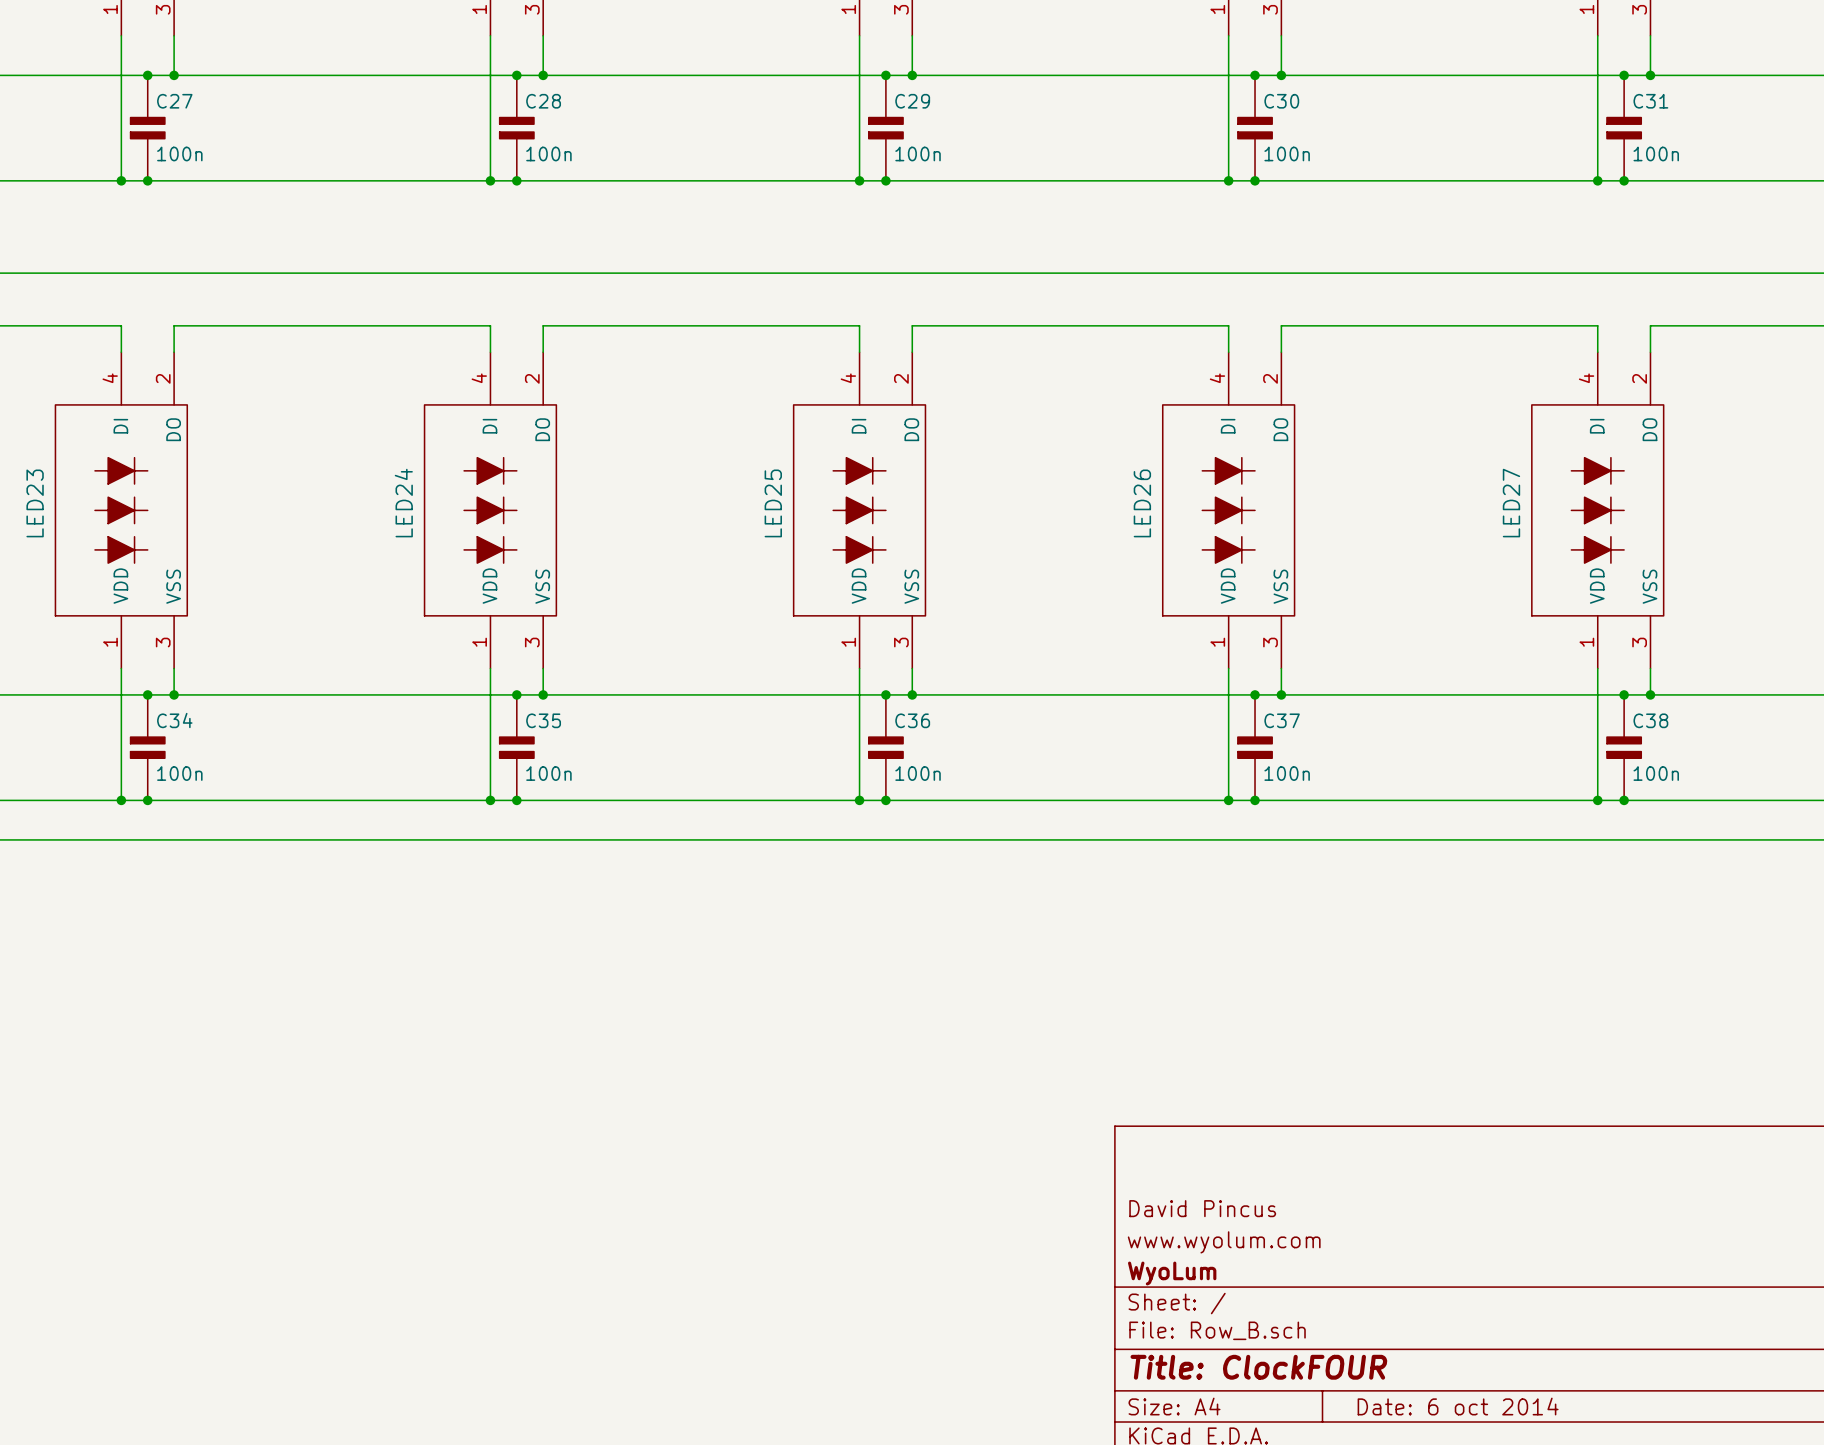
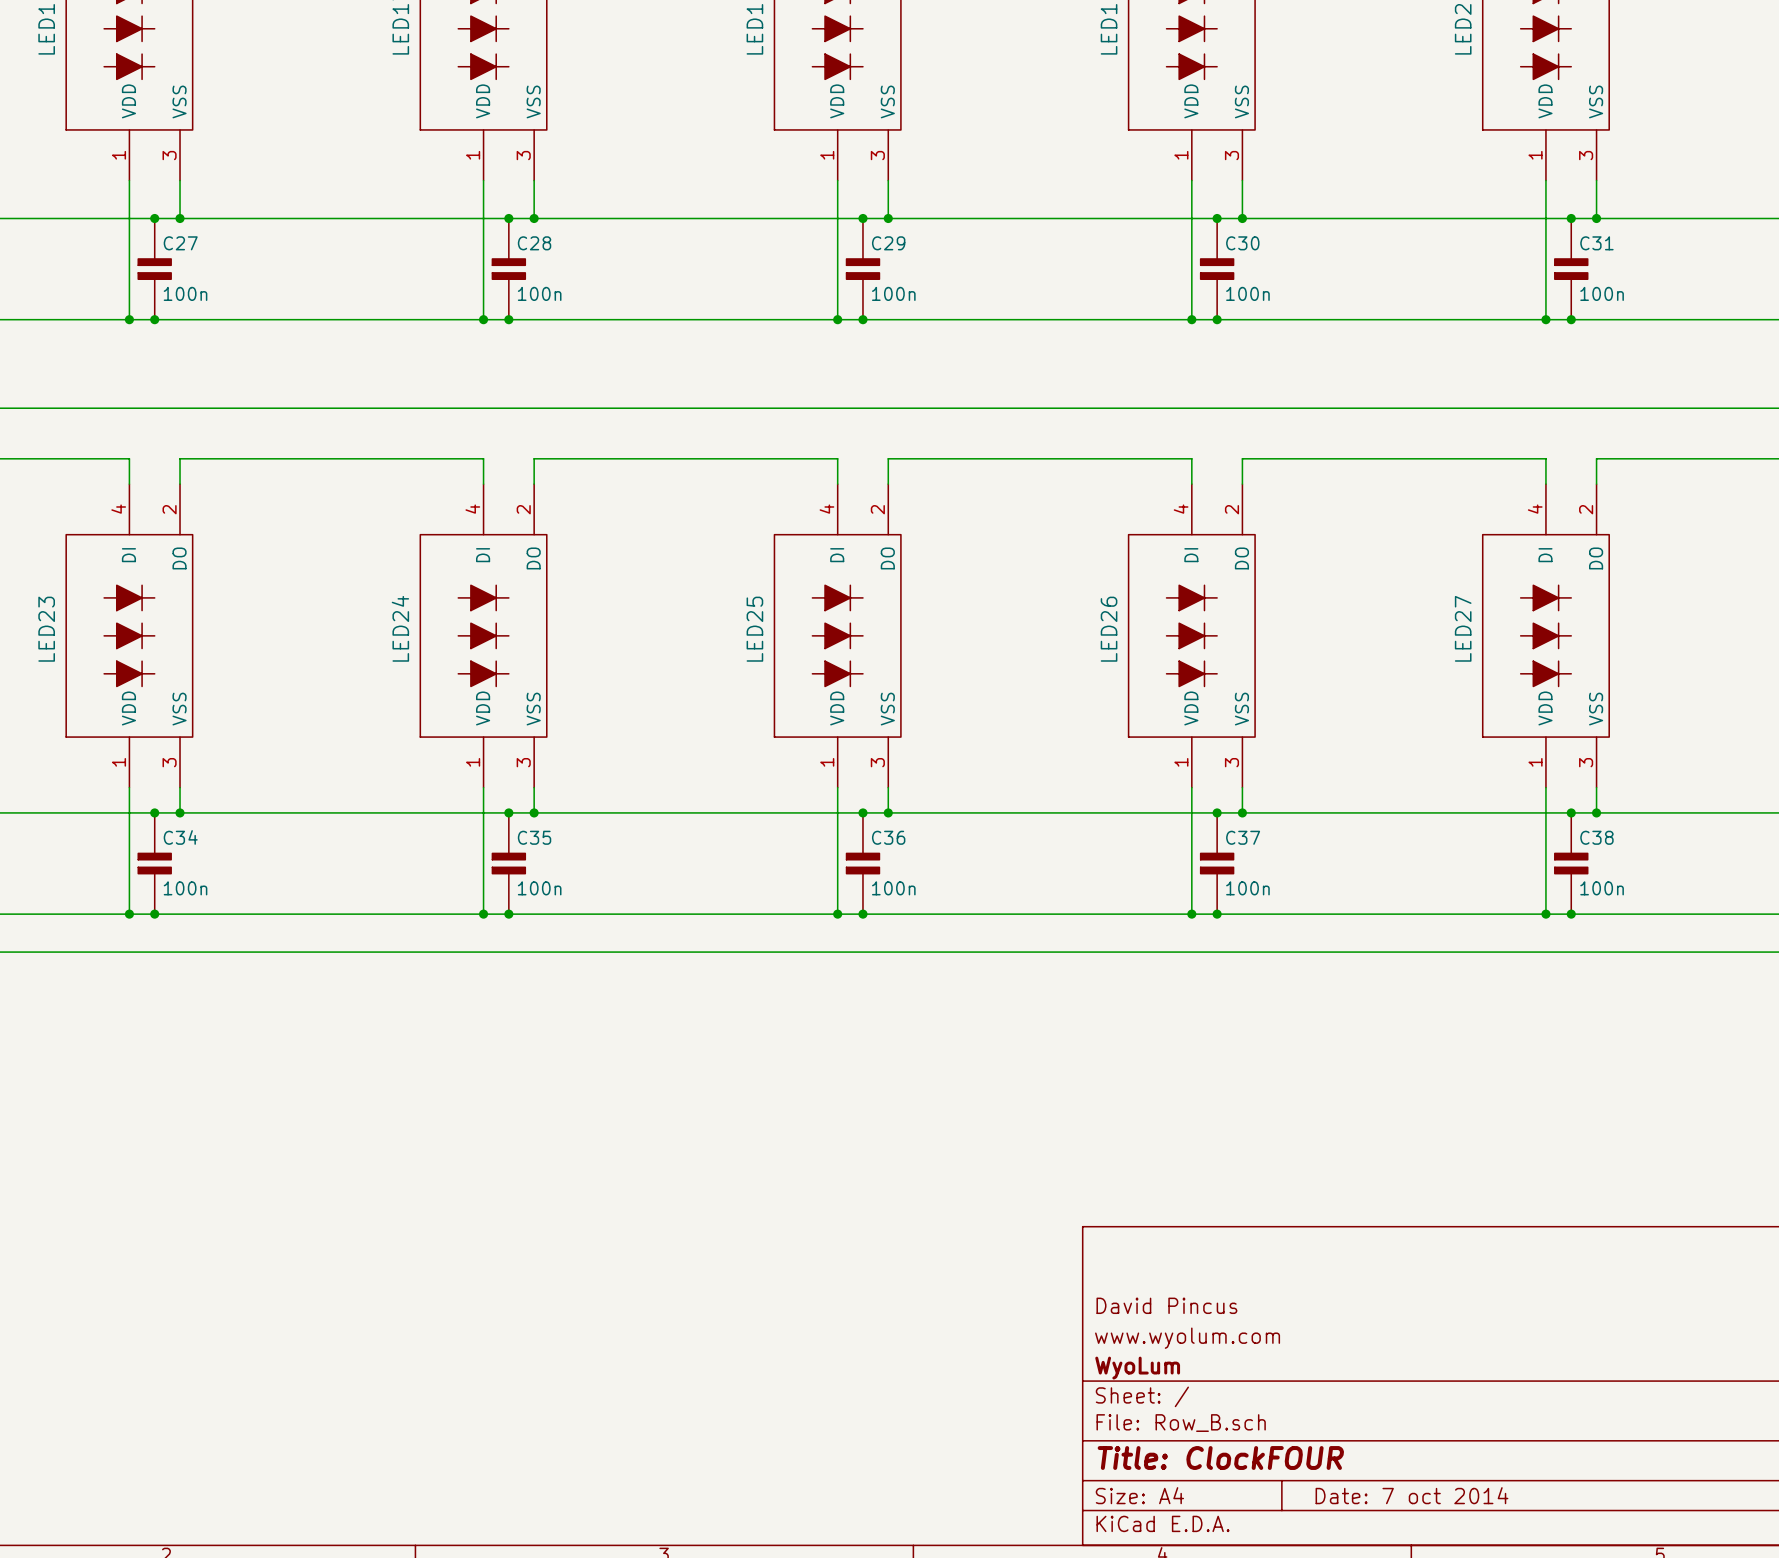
title block: Date: 6 oct 2014 (1458, 1406) -> Date: 7 oct 2014 (1411, 1495)

